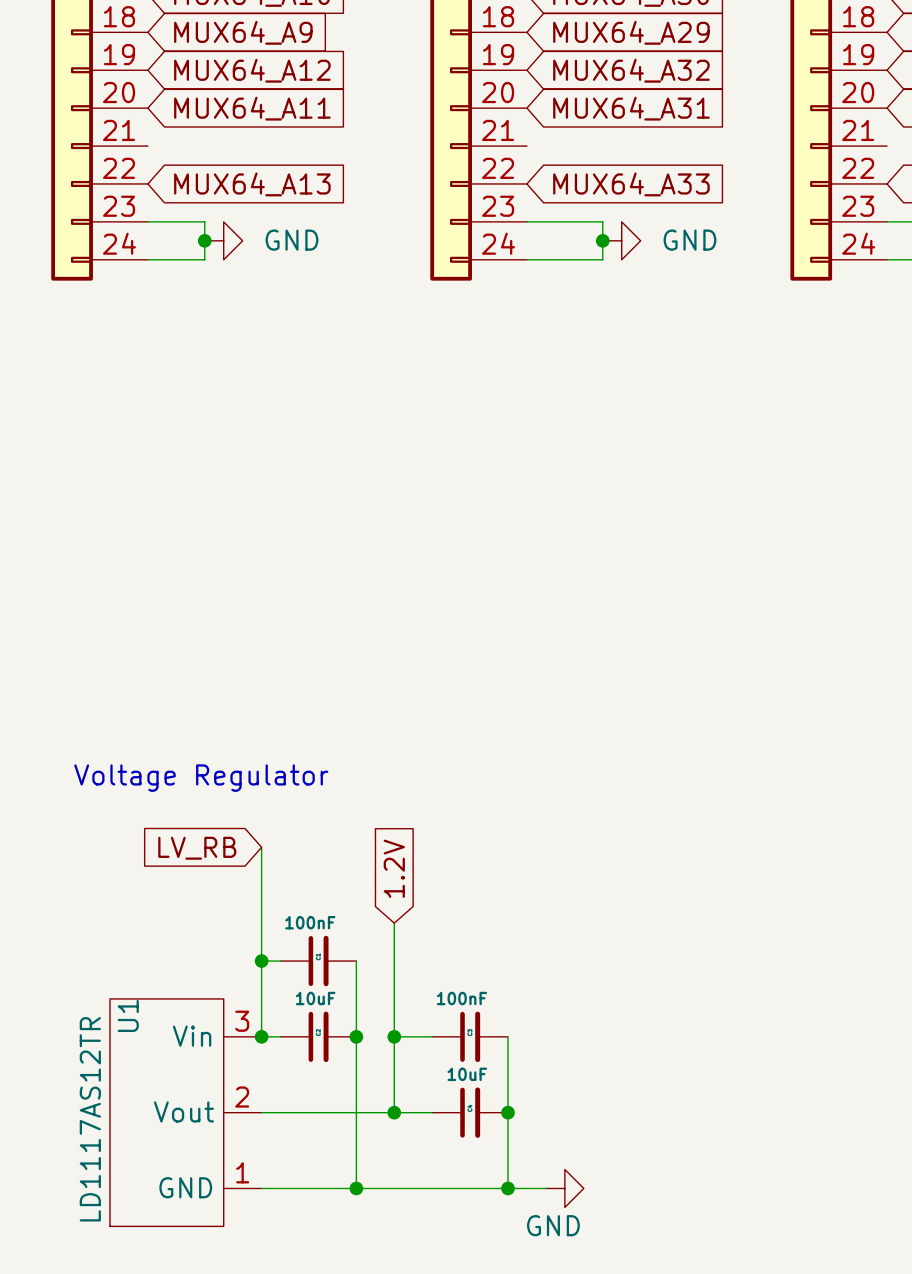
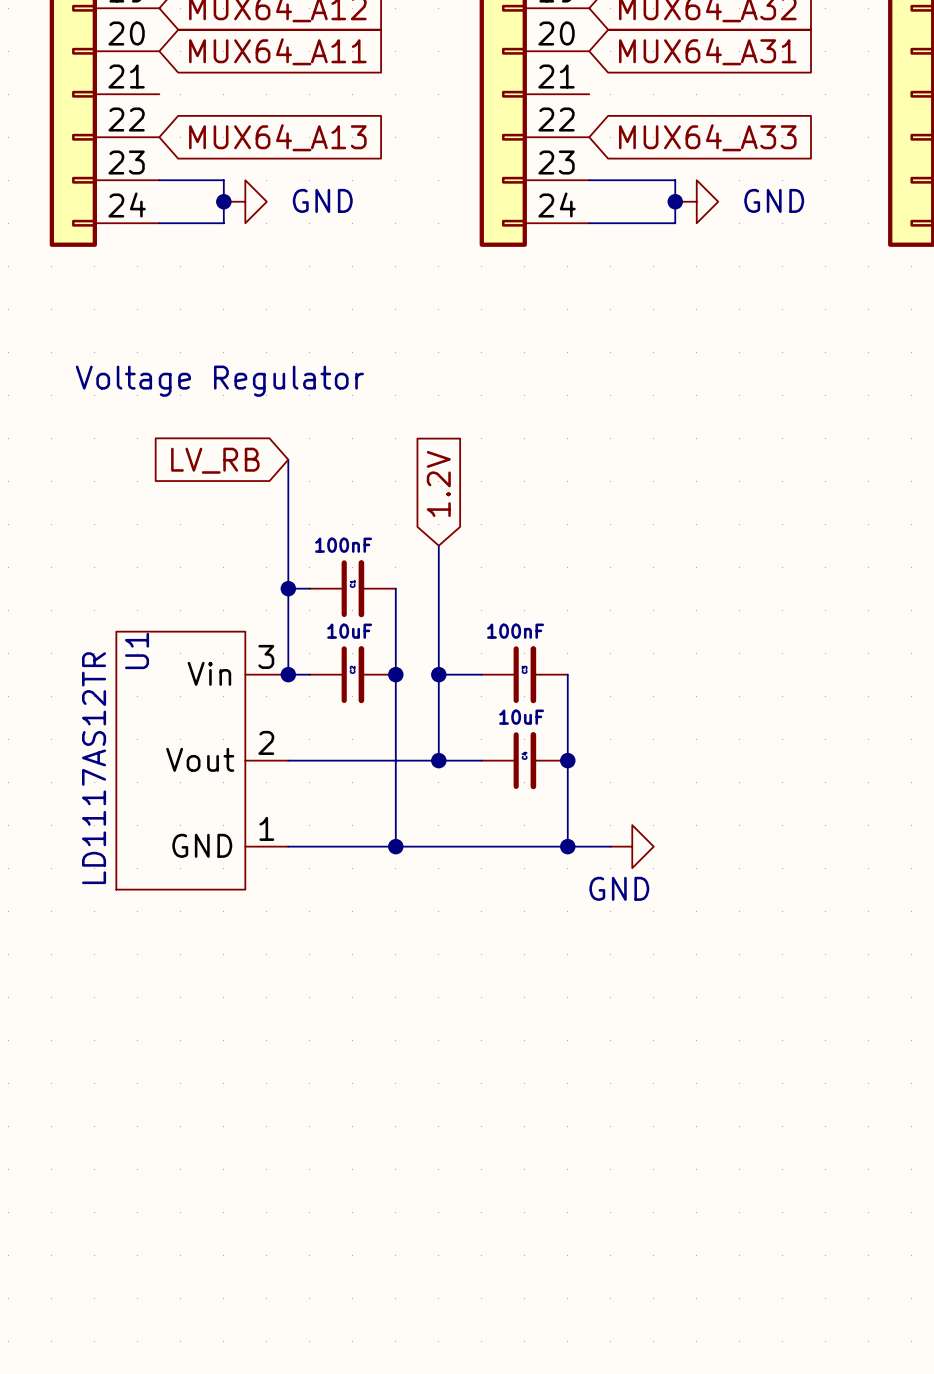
text: none -> Voltage Regulator (219, 381)
wire: none -> (288, 459) (288, 674) (309, 674)
global label: none -> LV_RB (215, 460)
global label: none -> 1.2V (438, 483)
wire: none -> (438, 545) (438, 760)
wire: none -> (288, 588) (309, 588)
junction: none -> (288, 588)
wire: none -> (395, 588) (395, 846)
junction: none -> (288, 674)
junction: none -> (395, 674)
wire: none -> (438, 674) (481, 674)
junction: none -> (438, 674)
wire: none -> (567, 674) (567, 846)
wire: none -> (288, 760) (481, 760)
junction: none -> (438, 760)
junction: none -> (567, 760)
text: Voltage Regulator (201, 778) -> none
wire: none -> (288, 846) (610, 846)
junction: none -> (395, 846)
junction: none -> (567, 846)
power symbol: none -> GND (632, 846)
wire: (261, 847) (261, 1036) (280, 1036) -> none
global label: LV_RB (197, 848) -> none
global label: 1.2V (394, 868) -> none
wire: (394, 923) (394, 1112) -> none
wire: (261, 961) (280, 961) -> none
junction: (261, 961) -> none
part position: (318, 961) -> (352, 588)
wire: (356, 961) (356, 1188) -> none
junction: (261, 1036) -> none
part position: (318, 1036) -> (352, 674)
junction: (356, 1036) -> none
wire: (394, 1036) (432, 1036) -> none
junction: (394, 1036) -> none
part position: (470, 1036) -> (524, 674)
wire: (508, 1036) (508, 1188) -> none
U1 position: (185, 1112) -> (202, 760)
wire: (261, 1112) (432, 1112) -> none
junction: (394, 1112) -> none
part position: (470, 1112) -> (524, 760)
junction: (508, 1112) -> none
wire: (261, 1188) (545, 1188) -> none
junction: (356, 1188) -> none
junction: (508, 1188) -> none
power symbol: GND (564, 1188) -> none

